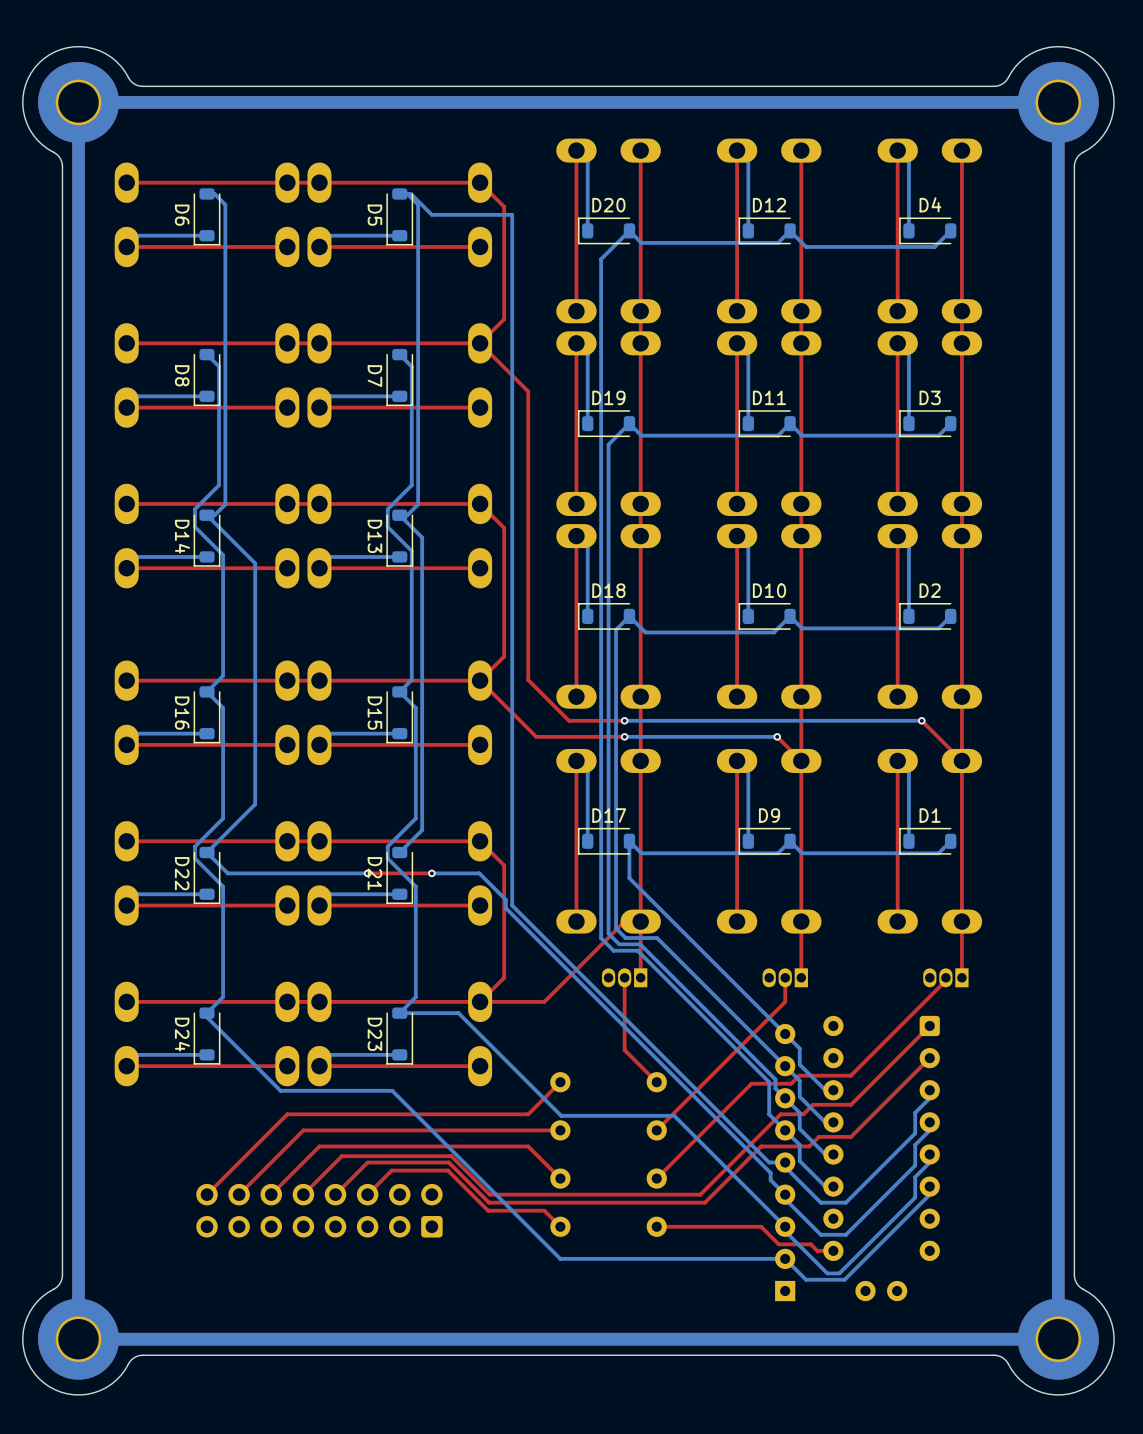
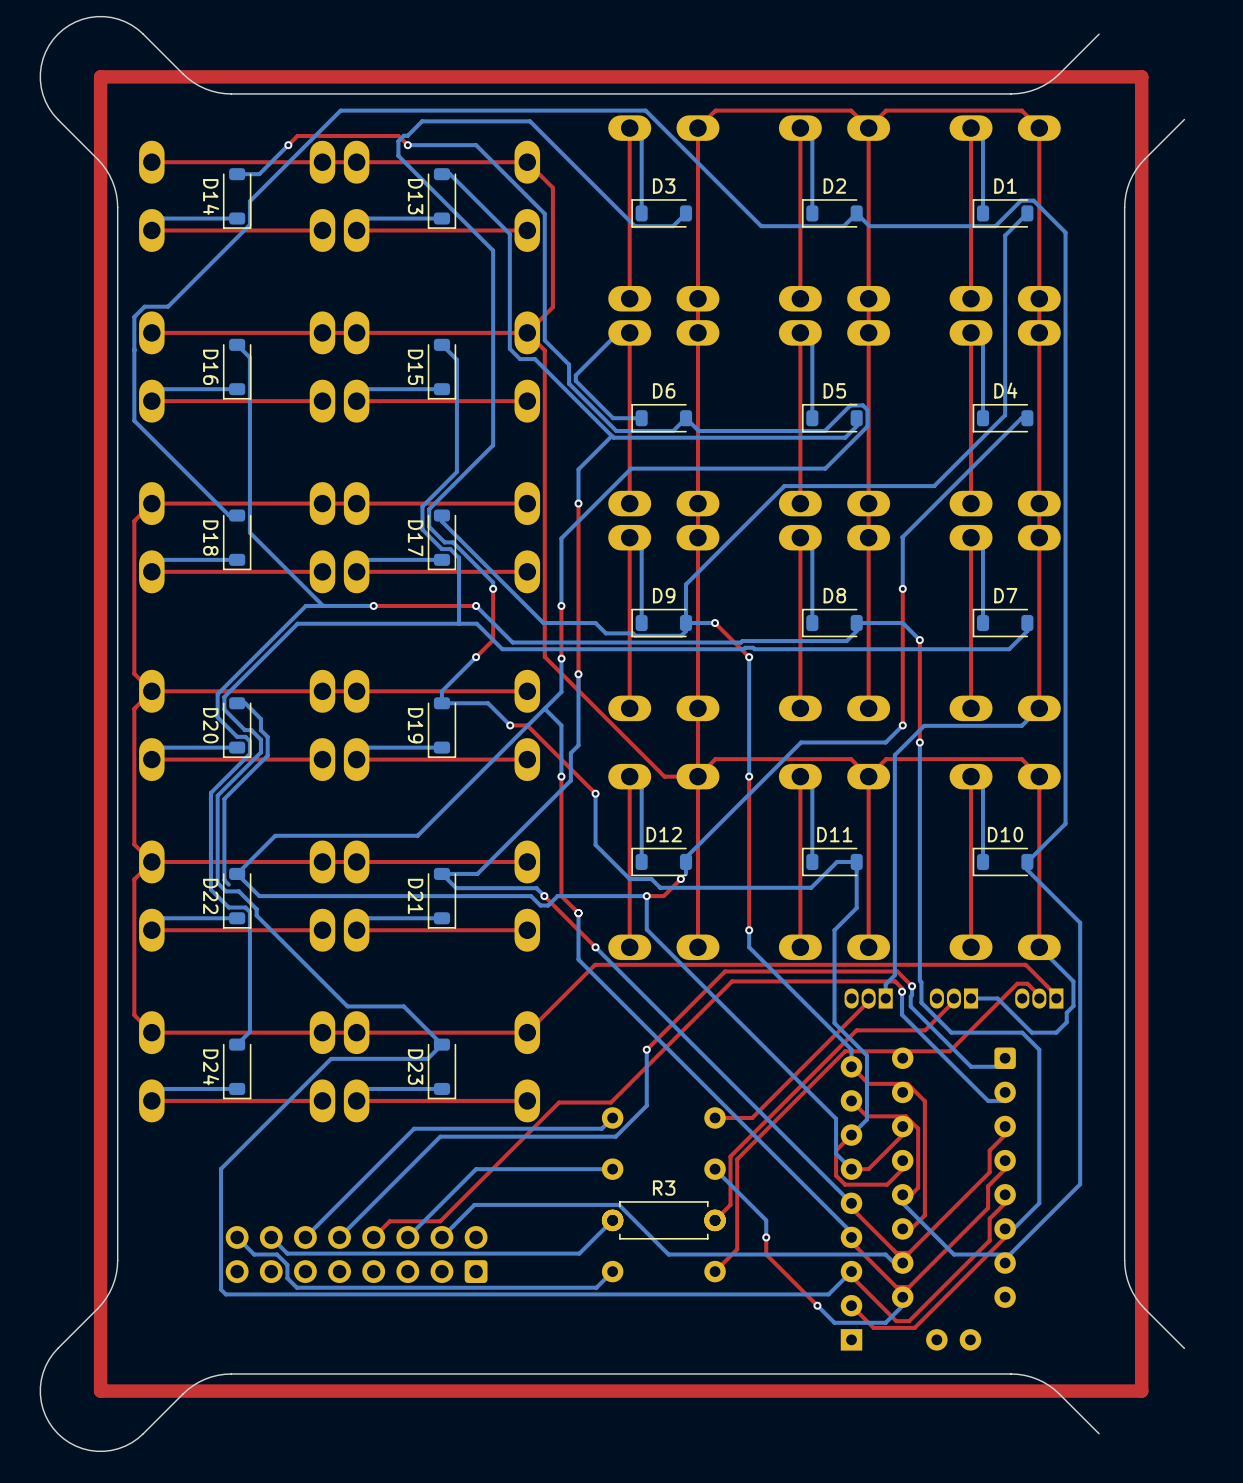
board edge: none -> (143, 34) (125, 21) (111, 17) (96, 16) (82, 19) (63, 29) (53, 39) (43, 58) (40, 73) (43, 94) (48, 108) (106, 169) (114, 187) (117, 200) (117, 1260) (114, 1280) (106, 1298) (48, 1359) (43, 1373) (40, 1394) (43, 1409) (53, 1428) (63, 1438) (82, 1448) (96, 1451) (111, 1450) (125, 1446) (143, 1433)
board edge: none -> (1099, 34) (1048, 82) (1030, 91) (1011, 93) (224, 93) (205, 88) (193, 82) (143, 34)
board edge: (1008, 77) (1020, 61) (1036, 50) (1055, 46) (1069, 47) (1087, 54) (1097, 62) (1109, 79) (1113, 98) (1111, 117) (1106, 129) (1094, 145) (1078, 155) (1074, 166) (1074, 1274) (1078, 1286) (1094, 1296) (1103, 1306) (1111, 1323) (1114, 1336) (1113, 1349) (1109, 1362) (1102, 1373) (1092, 1383) (1081, 1389) (1069, 1393) (1055, 1394) (1042, 1392) (1030, 1387) (1015, 1375) (1005, 1359) (994, 1355) (142, 1355) (131, 1359) (121, 1375) (111, 1384) (93, 1392) (80, 1394) (67, 1393) (55, 1389) (44, 1383) (34, 1373) (27, 1362) (23, 1349) (22, 1336) (24, 1323) (30, 1311) (42, 1296) (57, 1286) (62, 1274) (62, 166) (57, 155) (42, 145) (33, 135) (24, 117) (22, 104) (23, 91) (27, 79) (34, 67) (44, 58) (55, 51) (67, 47) (80, 46) (93, 48) (106, 53) (121, 66) (131, 81) (142, 86) (994, 86) (1002, 83) (1008, 77) -> none
part: (78, 102) -> none
bottom track: (1058, 102) (78, 102) (78, 1339) (1058, 1339) (1058, 102) -> none
part: (1058, 102) -> none
board edge: none -> (1184, 119) (1136, 169) (1127, 187) (1124, 207) (1124, 1267) (1127, 1280) (1136, 1298) (1184, 1348)
top track: none -> (1039, 128) (1021, 110) (886, 110) (868, 128) (851, 110) (715, 110) (697, 128)
bottom track: none -> (288, 145) (259, 174) (245, 174)
via: none -> (288, 145)
bottom track: none -> (407, 145) (476, 145) (544, 213) (544, 340) (569, 364) (569, 383) (616, 430) (673, 430)
top track: none -> (407, 145) (398, 136) (297, 136) (288, 145)
via: none -> (407, 145)
bottom track: (214, 193) (225, 204) (225, 504) (214, 515) (207, 515) (255, 563) (255, 804) (242, 816) -> (561, 691) (417, 835) (275, 835)
bottom track: (407, 193) (411, 193) (431, 214) (512, 214) (512, 536) -> (824, 430) (850, 405) (862, 405) (867, 409) (867, 426) (825, 468) (631, 468) (561, 538)
bottom track: (418, 204) (418, 504) (407, 515) (399, 515) (422, 537) (422, 830) (399, 852) -> (461, 185) (509, 233) (509, 348) (520, 359) (534, 359) (613, 437) (845, 437) (856, 426) (856, 418)
D4 name: D4 (930, 204) -> D1 (1005, 186)
D20 name: D20 (608, 205) -> D3 (664, 186)
D12 name: D12 (769, 205) -> D2 (834, 186)
D6 name: D6 (182, 215) -> D14 (211, 196)
D5 name: D5 (374, 215) -> D13 (415, 196)
bottom track: (629, 230) (641, 242) (700, 242) -> (237, 515) (229, 515) (134, 420) (134, 316) (144, 306) (168, 306) (249, 224) (249, 201) (340, 110) (645, 110) (761, 226)
bottom track: (617, 242) (601, 259) (601, 938) (613, 950) (637, 950) (769, 1082) (770, 1115) -> (673, 226) (634, 226) (530, 121) (422, 121) (407, 135) (403, 135) (398, 141) (398, 155) (493, 250) (493, 445) (454, 483)
bottom track: (802, 242) (806, 246) (934, 246) -> (441, 515) (441, 521) (543, 623) (595, 623) (605, 633) (681, 635) (686, 631) (686, 584) (784, 486) (934, 486) (1005, 415) (1005, 235) (1010, 230)
bottom track: (576, 343) (587, 354) (587, 423) -> (629, 332) (618, 332) (575, 375) (575, 380) (613, 418) (641, 418)
top track: (496, 359) (528, 391) (528, 503) -> (544, 350) (544, 656) (578, 690)
bottom track: (411, 366) (411, 485) -> (454, 357) (456, 359) (456, 471) (422, 506) (422, 529) (441, 549) (450, 549)
D8 name: D8 (182, 375) -> D16 (210, 367)
D7 name: D7 (374, 376) -> D15 (415, 367)
D19 name: D19 (608, 397) -> D6 (664, 390)
D11 name: D11 (769, 397) -> D5 (834, 390)
D3 name: D3 (930, 397) -> D4 (1005, 390)
bottom track: (950, 423) (938, 435) (802, 435) (790, 423) (778, 435) (760, 435) -> (1027, 418) (1021, 418) (902, 537) (902, 588)
bottom track: (617, 435) (608, 444) (608, 933) (619, 944) (640, 944) (775, 1079) (775, 1088) (799, 1112) (799, 1128) (833, 1162) -> (869, 226) (995, 226) (1021, 200) (1033, 200) (1065, 232) (1065, 823) (1027, 861) (1027, 870) (1080, 922) (1080, 1184) (1009, 1254) (953, 1254) (902, 1203)
bottom track: none -> (611, 436) (578, 469) (578, 503)
bottom track: (219, 485) (195, 509) (195, 526) (223, 555) (223, 675) (207, 691) (223, 707) (223, 818) (195, 846) -> (237, 703) (245, 703) (260, 718) (260, 730) (267, 736) (267, 755) (224, 798) (224, 867)
bottom track: none -> (249, 483) (249, 532) (323, 605)
top track: none -> (151, 503) (134, 521) (134, 673) (151, 691) (134, 708) (134, 844) (151, 861) (134, 879) (134, 1015) (151, 1032)
top track: (488, 503) (480, 503) (504, 528) (504, 656) (480, 680) (536, 736) (624, 736) -> none
via: none -> (578, 503)
bottom track: (387, 525) (407, 546) -> (429, 526) (444, 542) (453, 542) (493, 582) (493, 588)
D14 name: D14 (182, 536) -> D18 (210, 538)
D13 name: D13 (374, 536) -> D17 (415, 538)
bottom track: (411, 551) (411, 679) (399, 691) (415, 707) (415, 818) (387, 846) (387, 858) (415, 886) (415, 997) (399, 1013) (458, 1013) (561, 1115) (674, 1115) (785, 1226) (785, 1231) (827, 1273) (839, 1273) (915, 1197) (915, 1177) (929, 1162) -> (454, 553) (459, 557) (459, 623)
top track: none -> (493, 588) (493, 640) (476, 657)
via: none -> (493, 588)
top track: none -> (902, 588) (902, 725)
via: none -> (902, 588)
D18 name: D18 (608, 590) -> D9 (664, 595)
D10 name: D10 (769, 590) -> D8 (834, 595)
D2 name: D2 (930, 590) -> D7 (1005, 595)
via: none -> (373, 605)
bottom track: none -> (476, 605) (512, 642) (846, 641) (856, 631) (856, 623) (902, 623) (919, 640)
top track: none -> (476, 605) (373, 605)
via: none -> (476, 605)
bottom track: (512, 600) (512, 650) -> none
top track: none -> (561, 605) (561, 658)
via: none -> (561, 605)
bottom track: none -> (715, 623) (686, 623)
top track: none -> (715, 623) (749, 657)
via: none -> (715, 623)
bottom track: (950, 616) (938, 628) (802, 628) (790, 616) (774, 632) (645, 632) (629, 616) (616, 629) (616, 928) -> (1027, 623) (1027, 631) (1009, 649) (502, 649) (476, 623) (297, 623) (224, 696) (224, 709) (244, 730) (251, 730) (260, 739) (260, 752) (217, 795) (217, 883) (226, 891) (238, 891) (256, 909) (256, 915) (347, 1006) (403, 1006) (441, 1044) (427, 1058) (331, 1058) (221, 1168) (221, 1289) (225, 1294) (828, 1294) (851, 1271)
top track: none -> (919, 640) (919, 742)
via: none -> (919, 640)
bottom track: none -> (476, 657) (441, 691) (441, 703) (488, 703) (510, 725)
via: none -> (476, 657)
bottom track: none -> (749, 657) (749, 776)
via: none -> (749, 657)
via: none -> (561, 658)
bottom track: none -> (578, 674) (578, 745) (570, 753) (570, 780) (477, 873) (441, 873) (456, 888) (536, 888) (544, 896)
via: none -> (578, 674)
bottom track: (512, 681) (512, 712) -> (544, 708) (561, 725)
top track: (801, 696) (801, 760) -> none
bottom track: none -> (1039, 708) (1021, 725) (924, 725) (894, 755) (894, 975) (885, 984) (885, 998)
top track: (961, 696) (961, 760) (945, 760) -> none
top track: none -> (510, 725) (527, 725) (595, 793)
via: none -> (510, 725)
via: none -> (902, 725)
D16 name: D16 (182, 713) -> D20 (210, 725)
D15 name: D15 (374, 713) -> D19 (415, 725)
top track: (624, 720) (569, 720) -> (851, 759) (715, 759) (697, 776) (664, 776) (621, 733)
via: (624, 720) -> none
bottom track: (921, 720) (624, 720) -> none
top track: (921, 720) (945, 744) -> (868, 776) (886, 759) (1021, 759)
via: (921, 720) -> none
via: none -> (919, 742)
via: (624, 736) -> none
bottom track: (777, 736) (624, 736) -> none
top track: (777, 736) (784, 744) -> none
via: (777, 736) -> none
bottom track: (512, 760) (512, 905) (769, 1162) (785, 1162) (785, 1167) (820, 1202) (845, 1202) (915, 1133) (915, 1112) (929, 1098) -> none
top track: none -> (561, 776) (561, 896) (578, 913)
via: none -> (561, 776)
top track: none -> (749, 776) (749, 930)
via: none -> (749, 776)
via: none -> (595, 793)
D17 name: D17 (609, 815) -> D12 (664, 834)
D9 name: D9 (769, 815) -> D11 (834, 834)
D1 name: D1 (930, 815) -> D10 (1005, 834)
bottom track: (950, 841) (938, 853) (802, 853) (790, 841) (778, 853) (641, 853) (629, 841) -> (902, 725) (885, 742) (801, 742) (686, 857) (686, 861)
bottom track: (629, 852) (629, 878) (799, 1048) -> (595, 793) (595, 844) (629, 879) (651, 879) (660, 887) (811, 887) (837, 861) (856, 861) (856, 908) (834, 930) (834, 1023) (866, 1055) (866, 1082)
top track: (480, 856) (480, 841) (504, 865) (504, 977) -> (1056, 998) (1056, 995) (1025, 964) (595, 964) (552, 1007)
top track: none -> (680, 879) (663, 896) (646, 896)
via: none -> (680, 879)
bottom track: (199, 862) (223, 886) (223, 997) (219, 1001) -> (373, 605) (305, 605) (217, 694) (217, 717) (237, 736) (245, 736) (249, 741) (249, 753) (210, 792) (210, 889) (228, 907) (245, 907) (249, 911) (249, 1031)
via: (367, 873) -> none
bottom track: none -> (476, 896) (407, 896)
top track: (431, 873) (367, 873) -> none
via: (431, 873) -> none
bottom track: (479, 873) (505, 899) (505, 908) (770, 1172) (770, 1180) (785, 1194) (785, 1199) (820, 1234) (845, 1234) (915, 1165) (915, 1144) (929, 1130) -> (526, 896) (531, 896) (540, 905) (548, 905) (557, 896) (646, 896) (646, 929) (671, 954)
top track: none -> (544, 896) (595, 947)
via: none -> (544, 896)
via: none -> (646, 896)
bottom track: none -> (578, 913) (578, 959) (851, 1232) (851, 1237)
via: none -> (578, 913)
bottom track: none -> (749, 930) (749, 947) (851, 1049) (851, 1066)
via: none -> (749, 930)
bottom track: none -> (595, 947) (851, 1203)
via: none -> (595, 947)
top track: (801, 921) (801, 969) -> none
bottom track: none -> (1039, 947) (1073, 981) (1073, 1006) (1066, 1012) (1066, 1022) (1056, 1032) (1031, 1032) (997, 998) (971, 998)
top track: (961, 921) (961, 966) -> none
bottom track: (625, 938) (657, 938) (799, 1080) -> (682, 964) (836, 1118) (836, 1153)
bottom track: none -> (912, 986) (910, 1006) (971, 1066) (1005, 1066)
top track: none -> (912, 986) (897, 971) (724, 971) (646, 1049)
via: none -> (912, 986)
bottom track: none -> (902, 991) (902, 1014) (988, 1100) (1005, 1100)
via: none -> (902, 991)
part: none -> (953, 998)
top track: (624, 977) (624, 1050) (656, 1082) -> (868, 1001) (752, 1117) (715, 1117)
part: (624, 977) -> none
top track: (640, 977) (640, 921) (624, 921) (544, 1001) (480, 1001) -> none
top track: (785, 977) (785, 1001) (656, 1130) -> none
part position: (785, 977) -> (868, 998)
top track: (945, 977) (945, 980) (850, 1075) (799, 1075) (791, 1083) (751, 1083) (671, 1164) -> (953, 998) (953, 1001) (925, 1030) (856, 1030) (730, 1156) (730, 1204)
part position: (945, 977) -> (1039, 998)
bottom track: (207, 1013) (207, 1017) (280, 1090) (392, 1090) (560, 1258) (785, 1258) (806, 1279) (844, 1279) (929, 1194) -> (919, 742) (921, 1002) (951, 1032) (1022, 1032) (1039, 1049) (1039, 1203) (1005, 1237)
bottom track: none -> (646, 1049) (646, 1105) (615, 1136) (440, 1136) (339, 1237)
via: none -> (646, 1049)
top track: (929, 1025) (850, 1104) (813, 1104) (803, 1114) (780, 1114) (700, 1194) (489, 1194) (451, 1156) (341, 1156) (303, 1194) -> none
top track: none -> (851, 1066) (868, 1083) (907, 1083) (924, 1101) (924, 1215) (902, 1237)
top track: (929, 1058) (850, 1136) (818, 1136) (809, 1146) (761, 1146) (704, 1202) (489, 1202) (448, 1162) (367, 1162) (350, 1179) -> (902, 991) (902, 988) (895, 981) (732, 981) (611, 1102) (559, 1102) (440, 1221) (389, 1221)
bottom track: (799, 1064) (833, 1098) -> (866, 1099) (866, 1116)
top track: none -> (851, 1100) (866, 1116) (905, 1116) (918, 1128) (918, 1187) (902, 1203)
bottom track: none -> (612, 1117) (601, 1128) (414, 1128) (305, 1237)
top track: (560, 1082) (528, 1114) (287, 1114) (207, 1194) -> none
bottom track: (799, 1083) (799, 1096) (833, 1130) -> (866, 1119) (851, 1135)
top track: none -> (851, 1135) (836, 1150) (836, 1175) (845, 1184) (887, 1184) (902, 1169)
top track: none -> (902, 1135) (868, 1169) (851, 1169)
top track: none -> (1005, 1135) (989, 1150) (989, 1172) (909, 1252) (896, 1252) (851, 1208) (851, 1203)
bottom track: none -> (612, 1169) (476, 1169) (407, 1237)
top track: (560, 1130) (303, 1130) (239, 1194) -> none
bottom track: none -> (715, 1169) (766, 1220) (766, 1237)
bottom track: (785, 1130) (799, 1144) (799, 1161) (833, 1194) -> none
top track: none -> (1005, 1169) (988, 1186) (988, 1208) (909, 1287) (896, 1287) (851, 1242) (851, 1237)
top track: none -> (1005, 1203) (989, 1218) (989, 1240) (909, 1321) (896, 1321) (851, 1276) (851, 1271)
bottom track: none -> (612, 1220) (579, 1253) (287, 1253) (271, 1237)
top track: (560, 1178) (528, 1146) (319, 1146) (271, 1194) -> none
R3: none -> (663, 1220)
bottom track: none -> (237, 1237) (254, 1254) (277, 1254) (287, 1264) (287, 1278) (296, 1287) (596, 1287) (612, 1271)
top track: (367, 1194) (391, 1170) (447, 1170) (488, 1210) (544, 1210) (560, 1226) -> none
bottom track: none -> (441, 1237) (474, 1204) (619, 1204) (668, 1254) (885, 1254) (902, 1271)
top track: none -> (766, 1237) (766, 1254) (817, 1305)
via: none -> (766, 1237)
top track: none -> (1005, 1237) (914, 1327) (873, 1327) (851, 1305)
top track: (656, 1226) (761, 1226) (778, 1244) (810, 1244) (817, 1250) (825, 1250) (833, 1258) -> (715, 1271) (737, 1249) (737, 1159) (845, 1051) (949, 1051) (1017, 983) (1027, 983) (1039, 995)
via: none -> (817, 1305)
bottom track: none -> (902, 1305) (885, 1322) (834, 1322) (817, 1305)
part: (78, 1339) -> none
part: (1058, 1339) -> none
board edge: none -> (1099, 1433) (1048, 1385) (1030, 1376) (1011, 1373) (224, 1374) (205, 1379) (193, 1385) (143, 1433)

